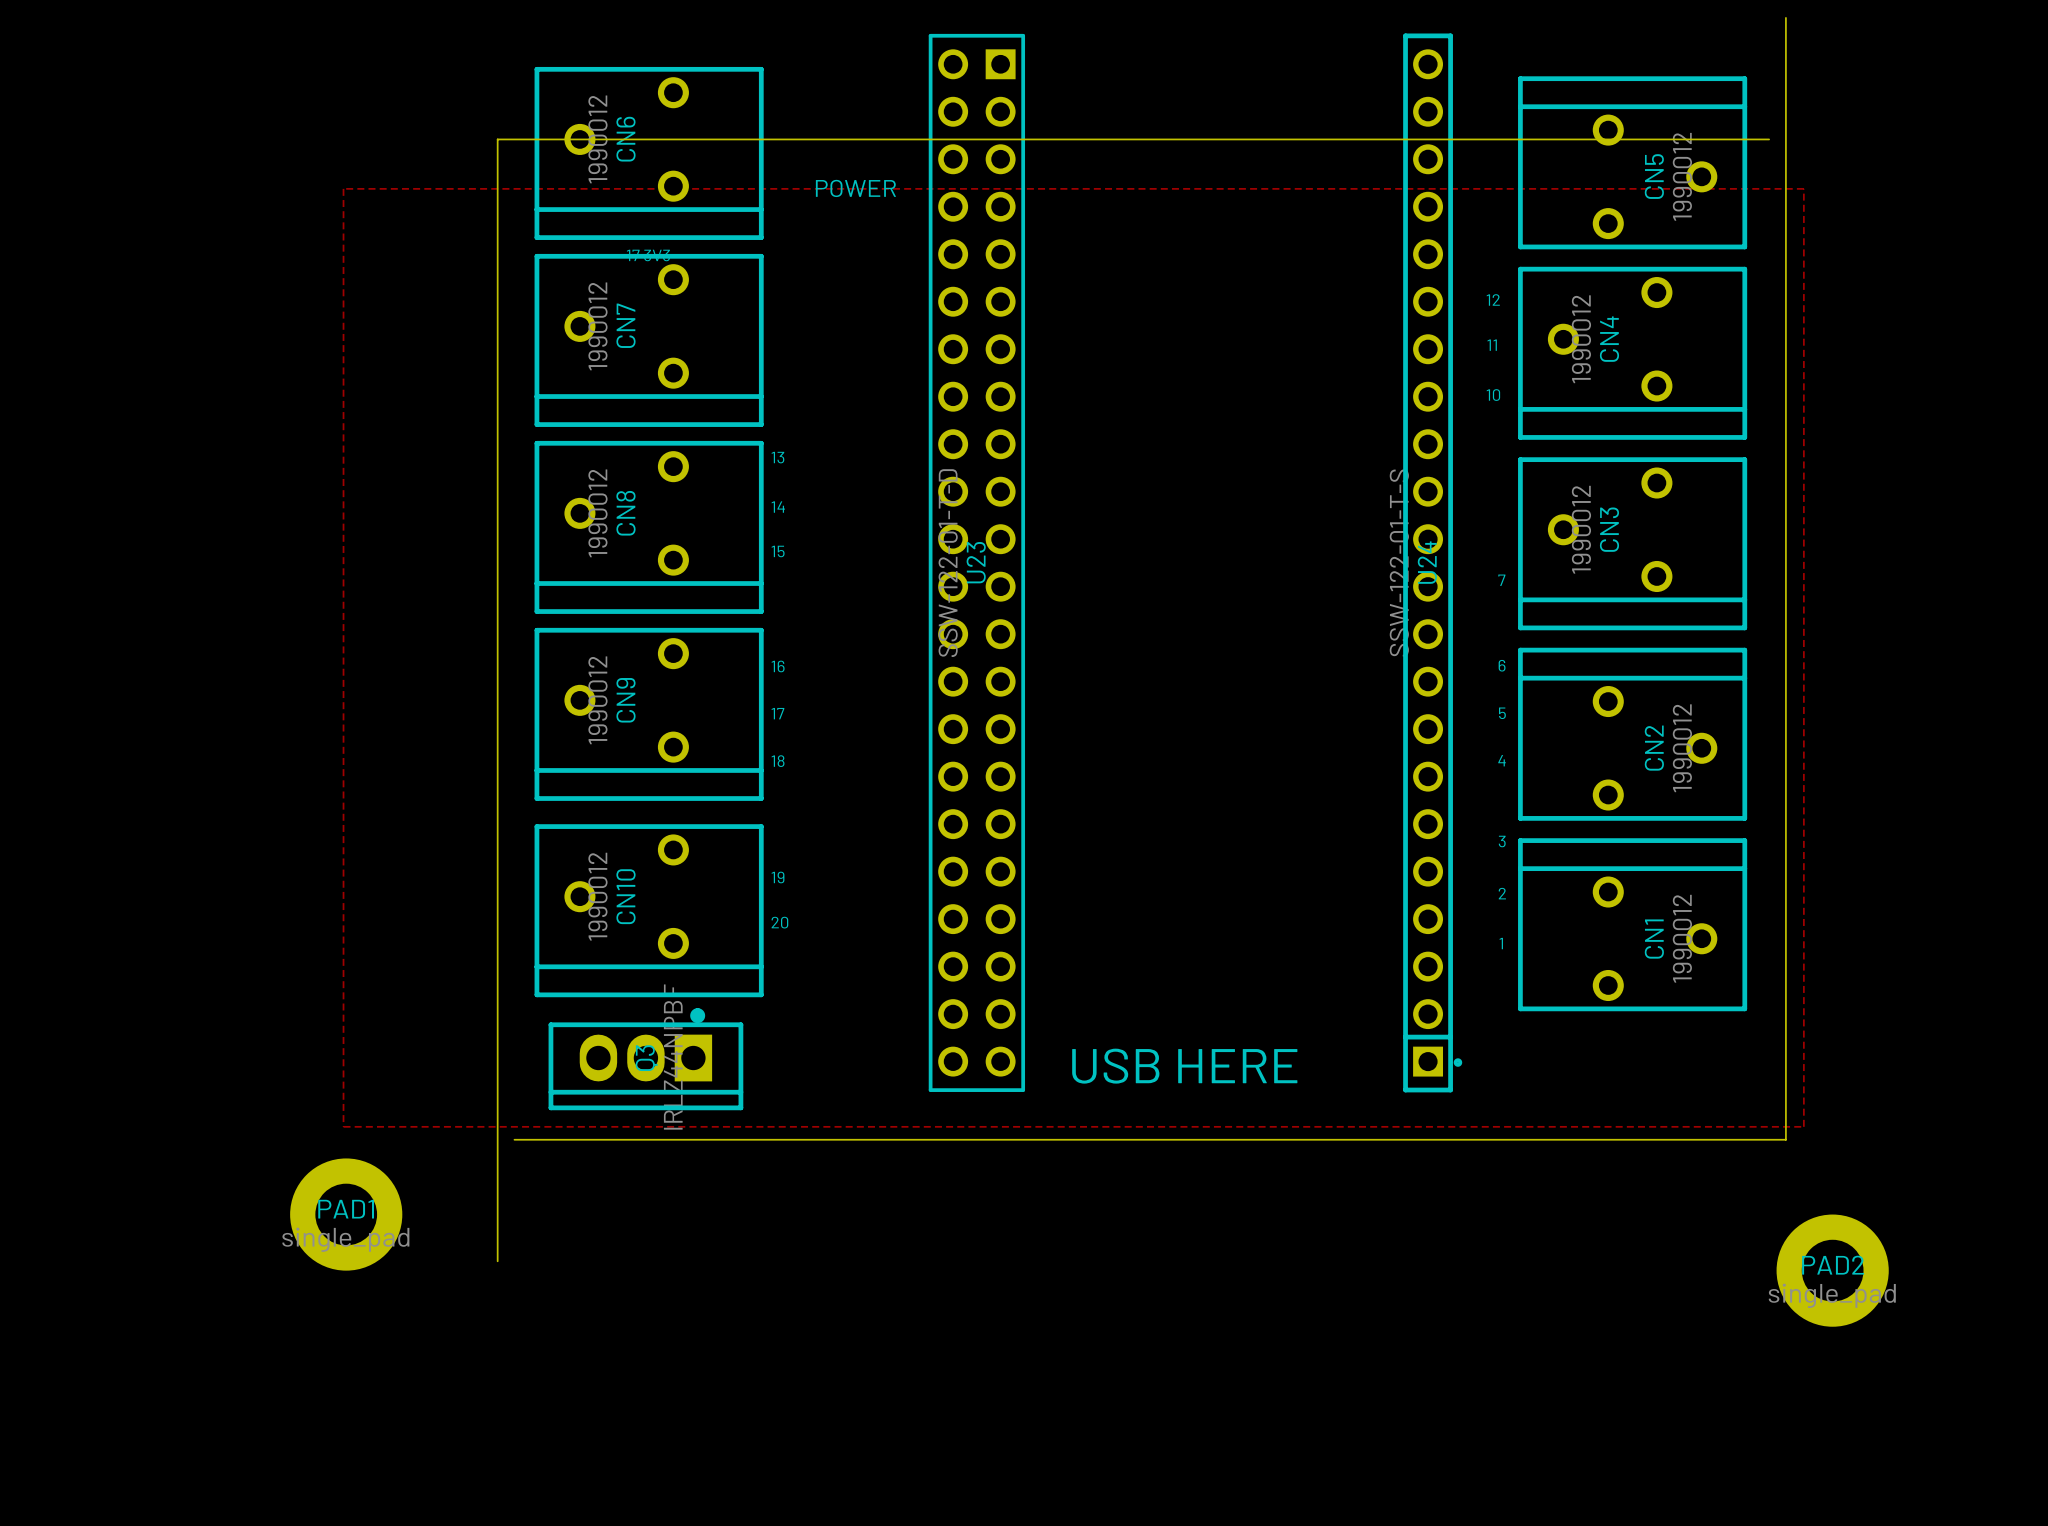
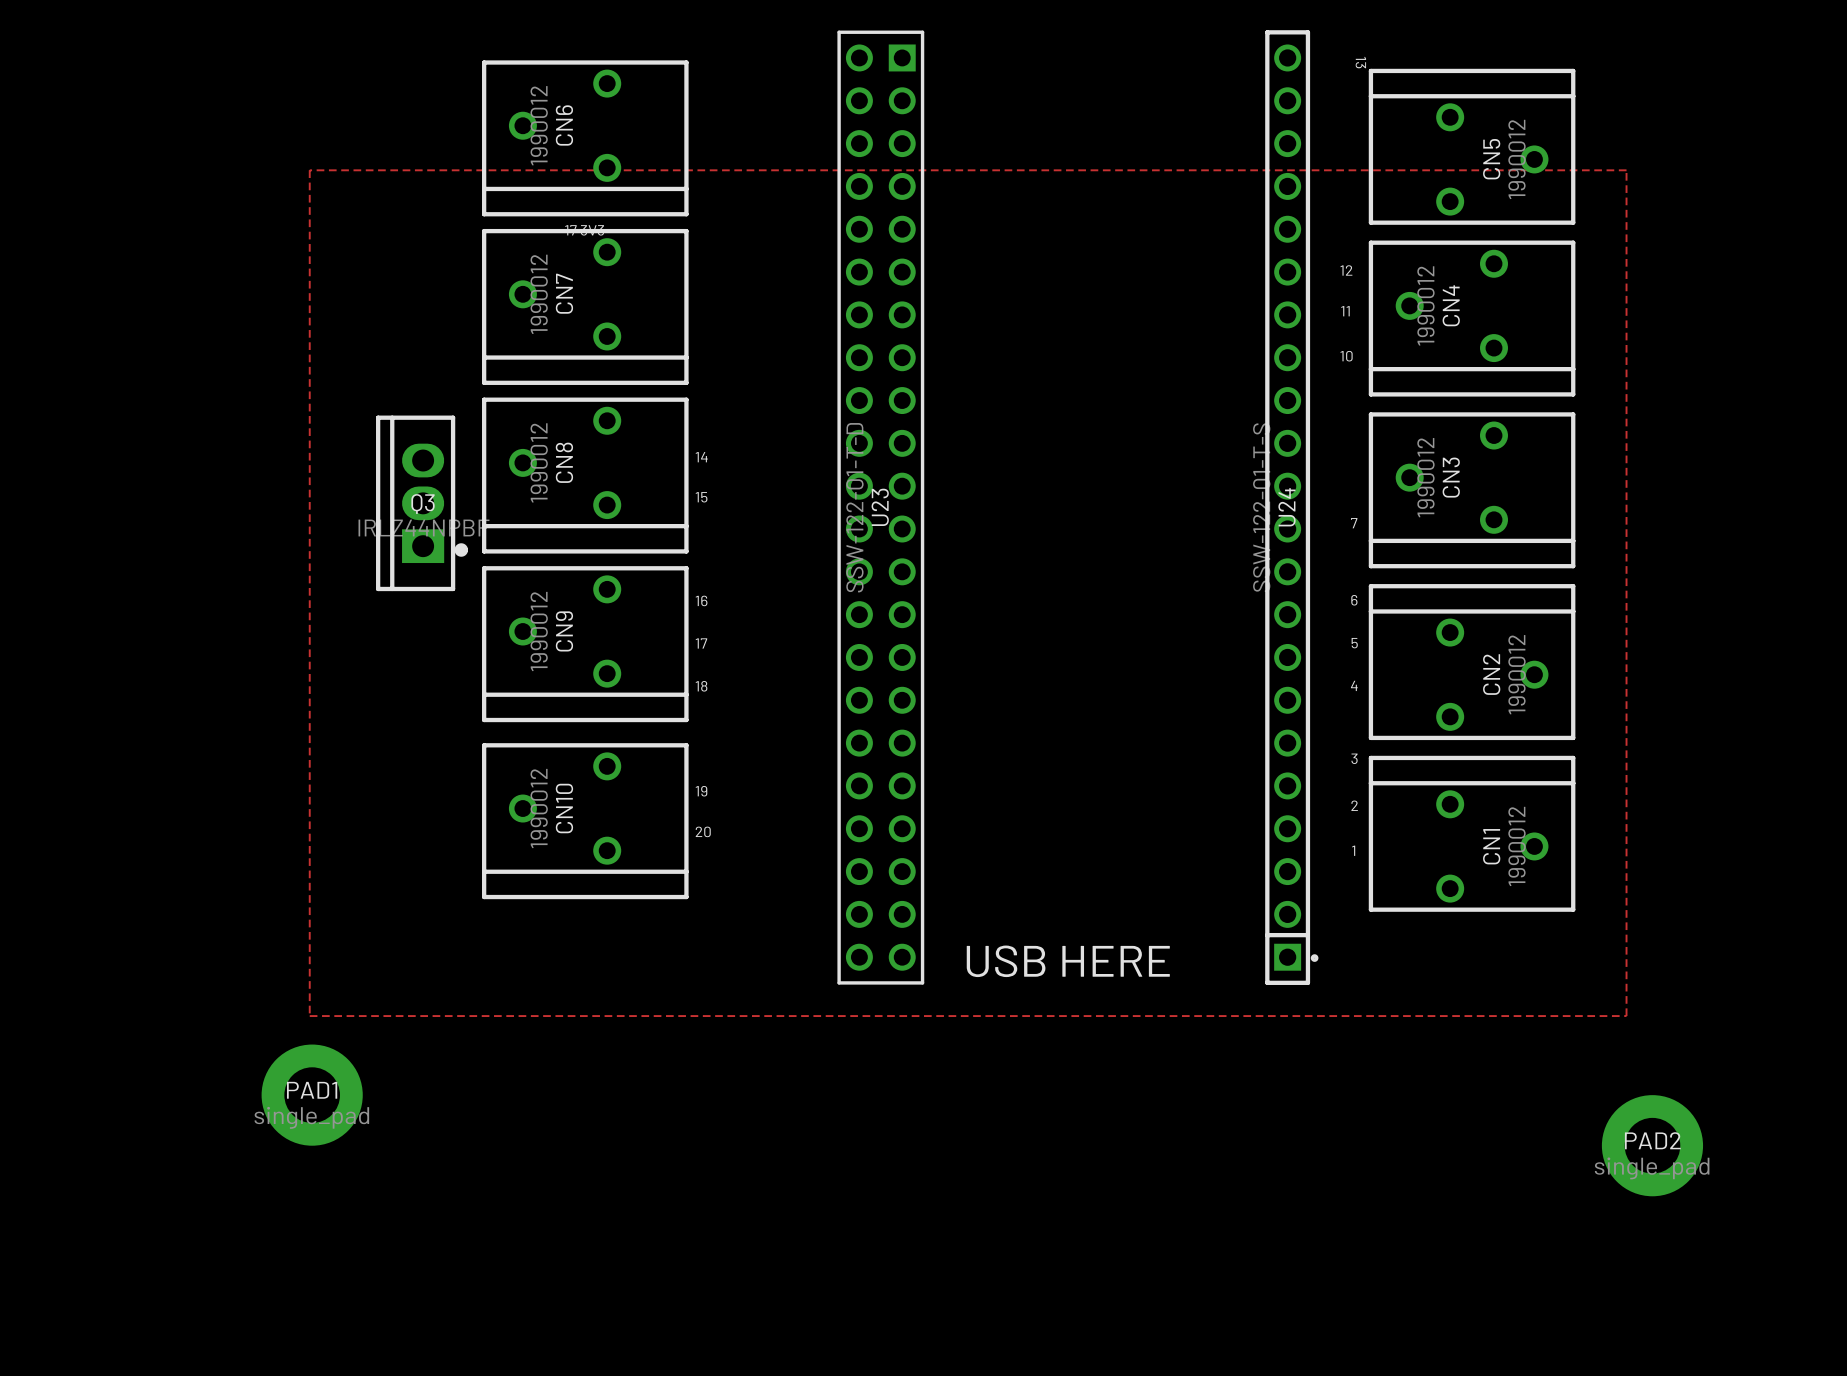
board edge: (1785, 17) (1785, 1139) (514, 1139) -> none
text: none -> 13 (1360, 62)
board edge: (1769, 139) (497, 139) (497, 1261) -> none
text: POWER (855, 188) -> none
text: 13 (777, 457) -> none
Q3 rotation: 0° (645, 1059) -> 90° clockwise (422, 503)
Q3 position: (645, 1059) -> (422, 503)

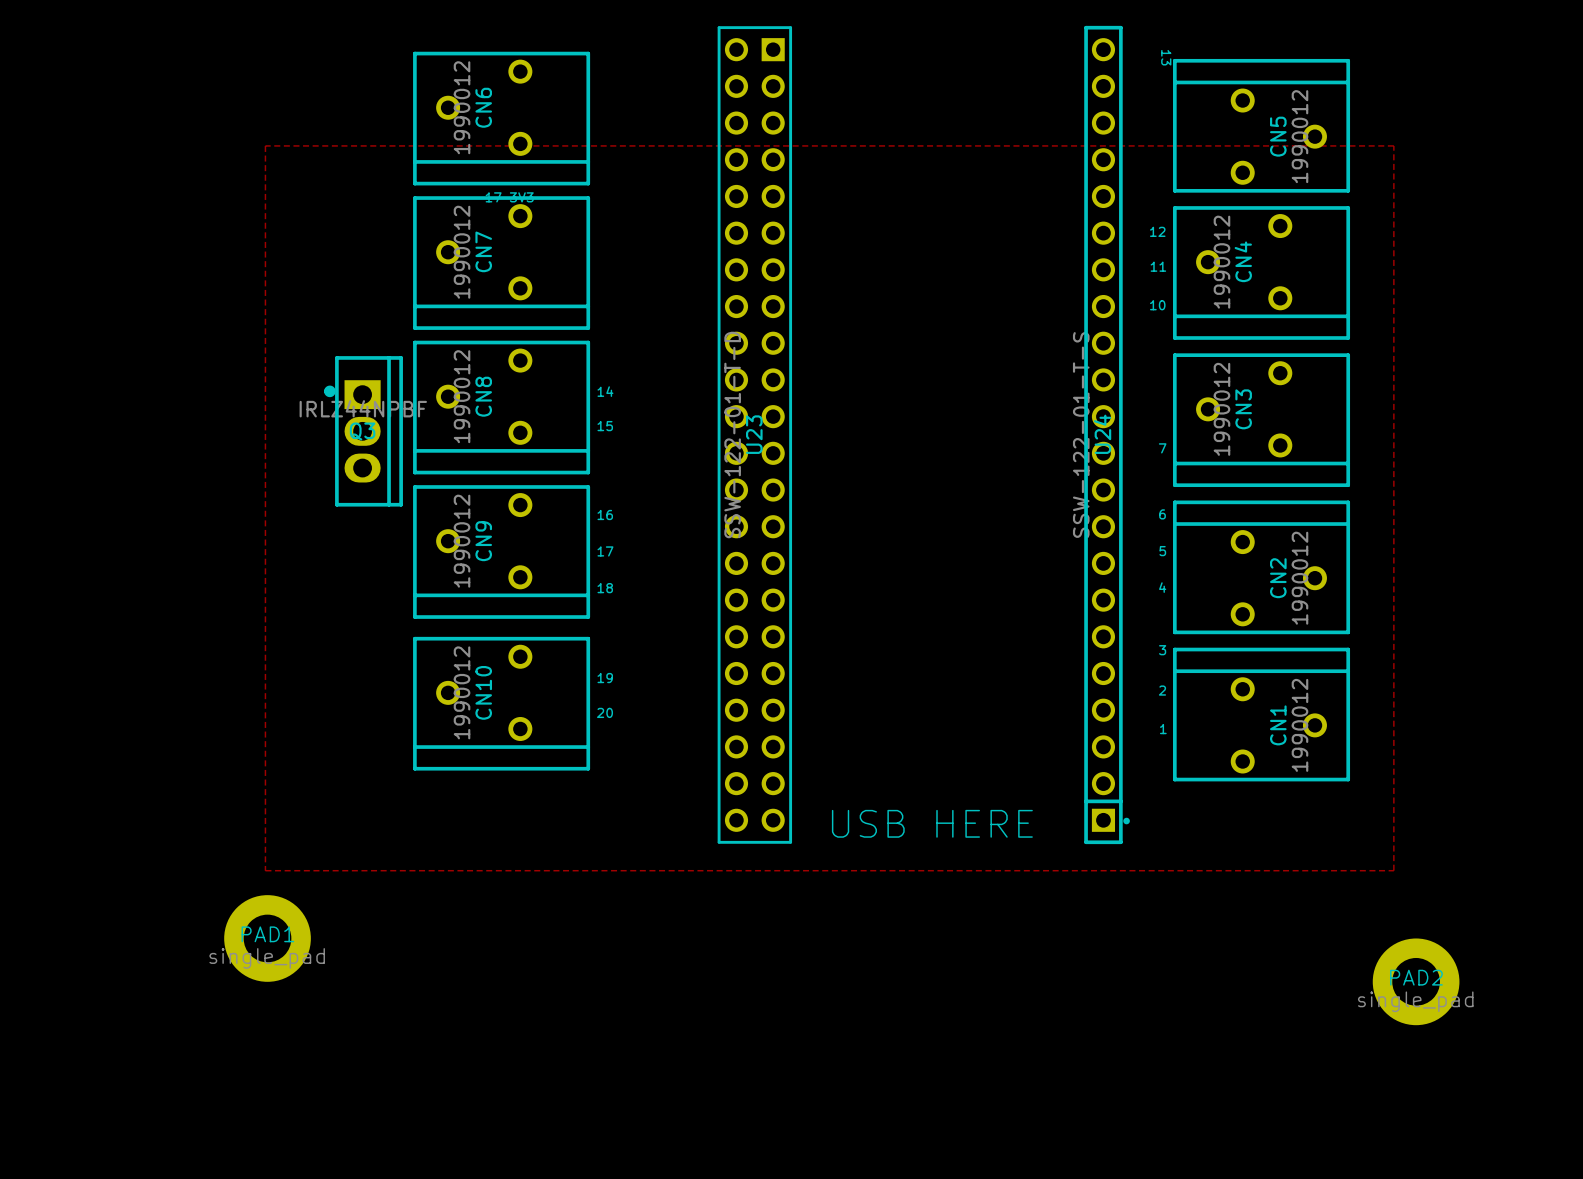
Q3 rotation: 0° (422, 503) -> 180° (363, 431)

